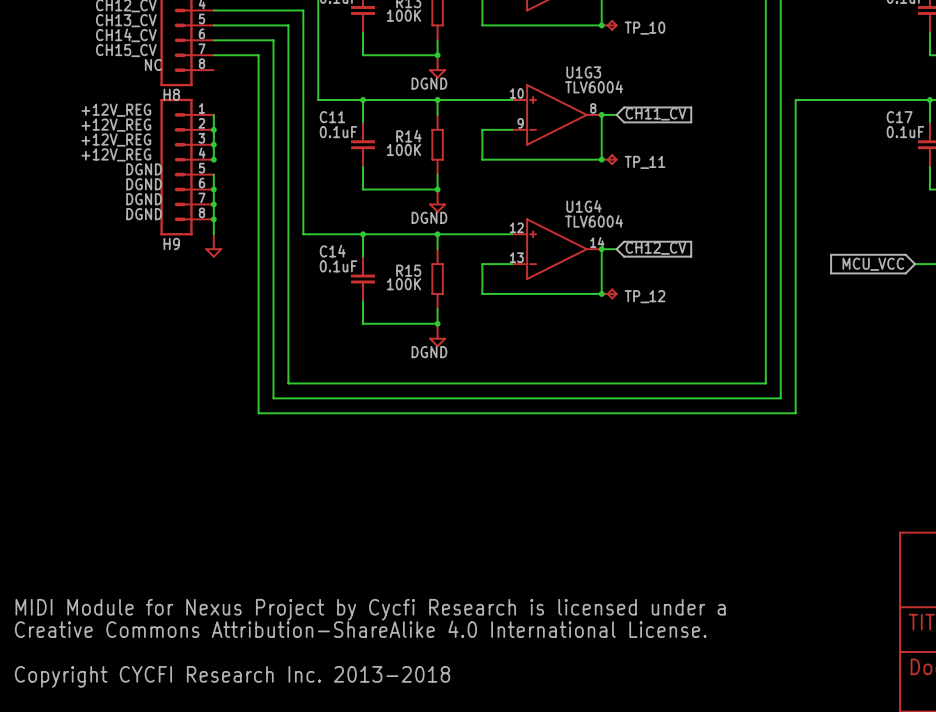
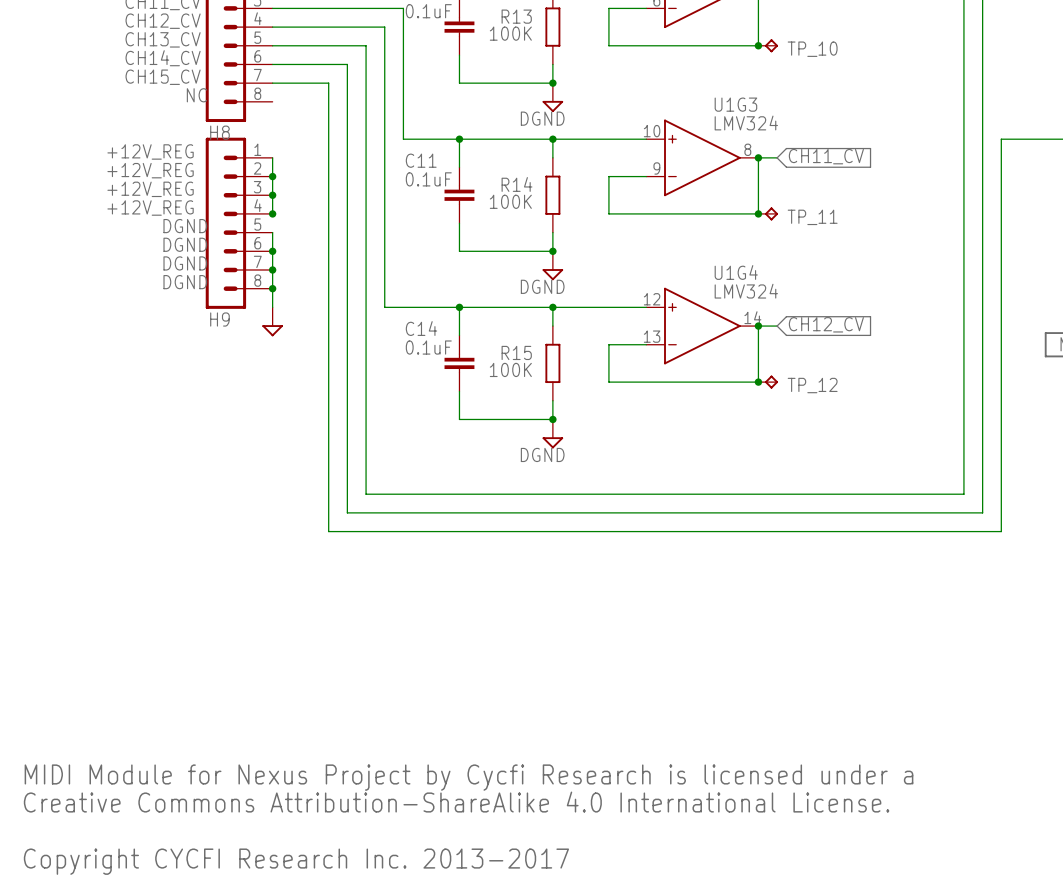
U1G3 value: TLV6004 (594, 87) -> LMV324 (746, 123)
U1G4 value: TLV6004 (594, 221) -> LMV324 (746, 291)
text: Copyright CYCFI Research Inc. 2013-2018 (232, 676) -> Copyright CYCFI Research Inc. 2013-2017 (296, 861)

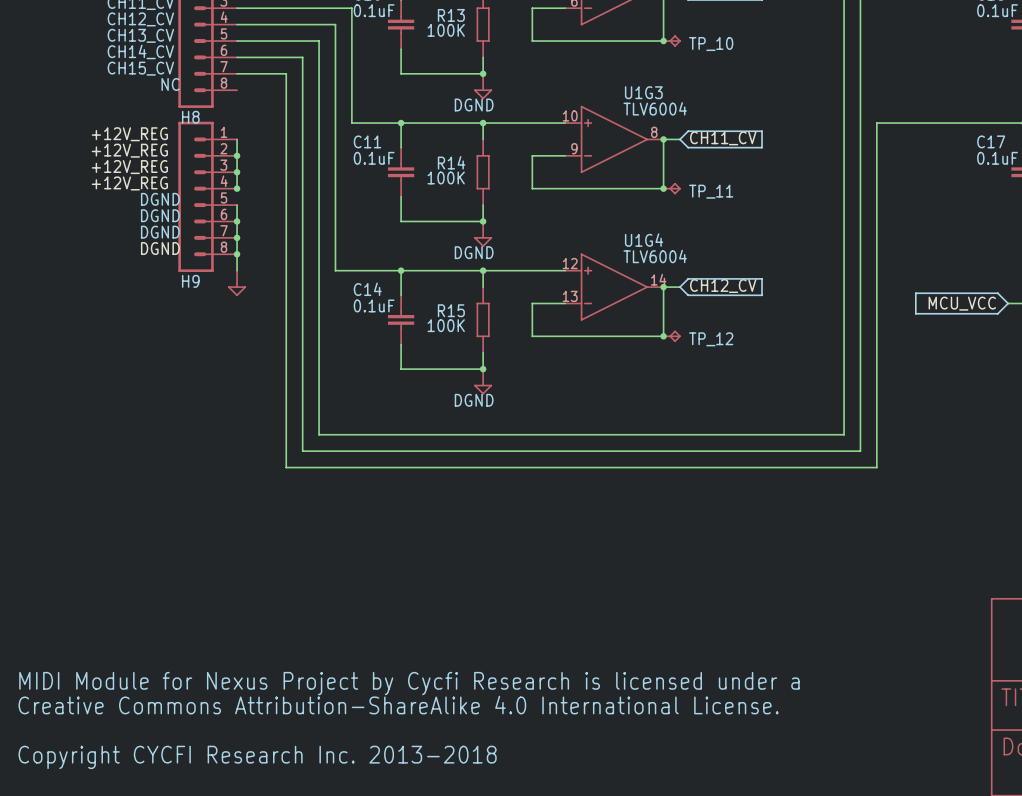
U1G3 value: LMV324 (746, 123) -> TLV6004 (655, 108)
U1G4 value: LMV324 (746, 291) -> TLV6004 (655, 256)
text: Copyright CYCFI Research Inc. 2013-2017 (296, 861) -> Copyright CYCFI Research Inc. 2013-2018 (257, 757)

